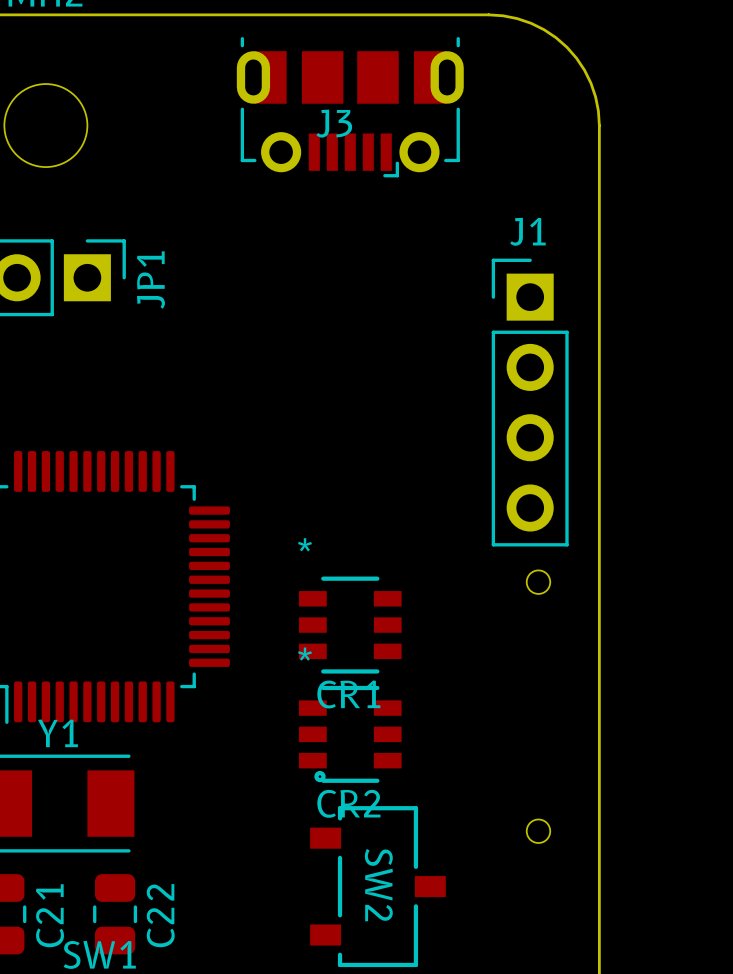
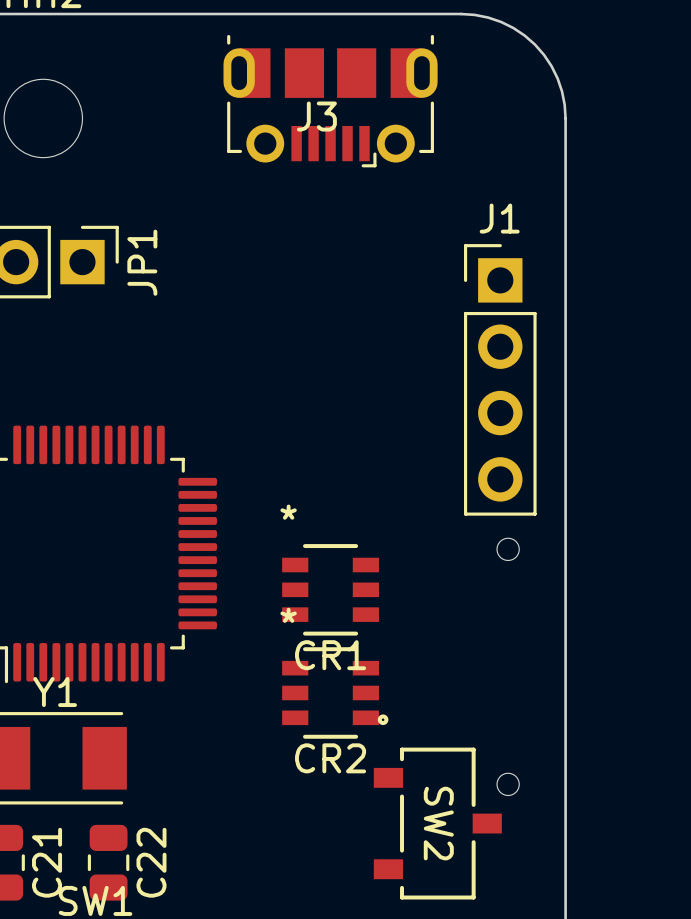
SW2 position: (377, 869) -> (437, 806)

